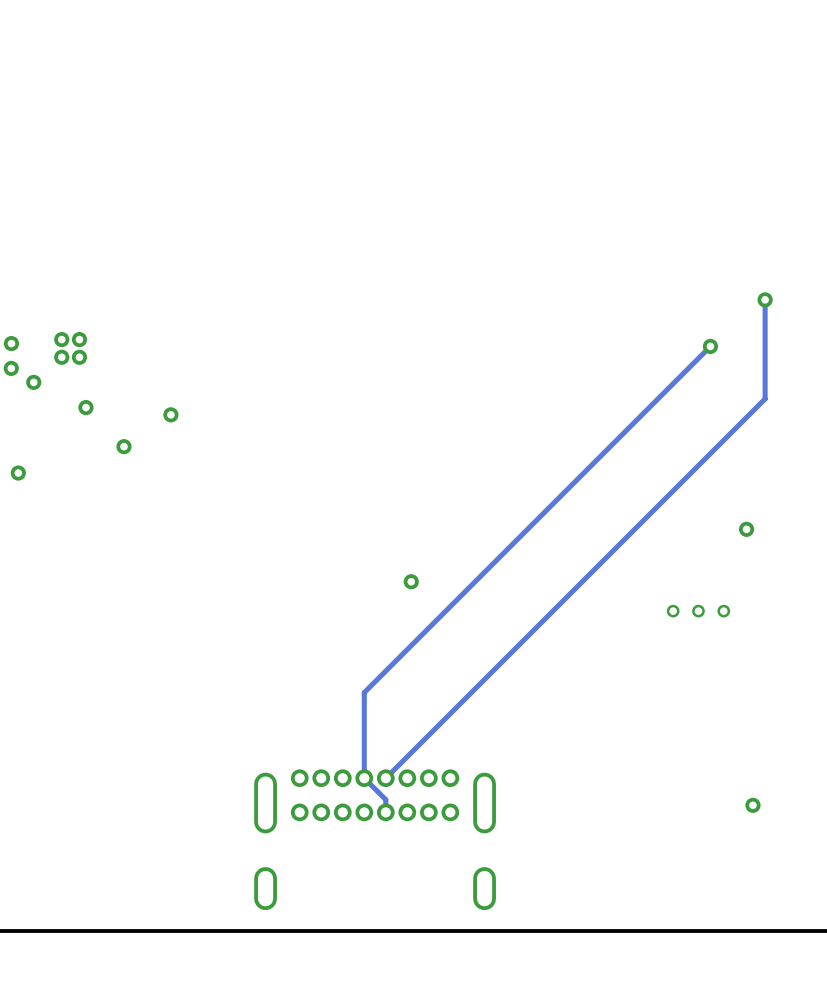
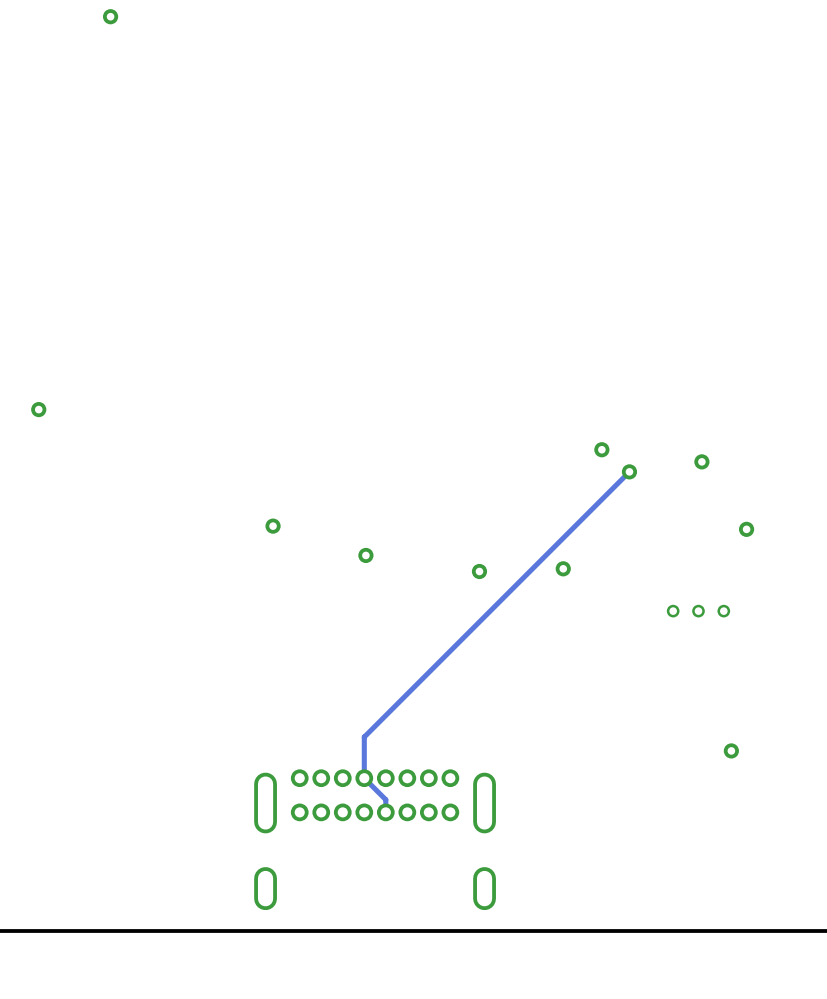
via: none -> (110, 16)
track: (765, 299) (765, 398) (385, 778) -> none
via: (765, 299) -> none
via: (61, 339) -> none
via: (79, 339) -> none
via: (11, 343) -> none
track: (710, 346) (364, 692) (364, 737) -> (629, 471) (364, 737)
via: (710, 346) -> none
via: (61, 357) -> none
via: (79, 357) -> none
via: (11, 368) -> none
via: (33, 382) -> none
via: (85, 407) -> none
via: none -> (38, 409)
via: (170, 414) -> none
via: (123, 446) -> none
via: none -> (601, 449)
via: none -> (701, 461)
via: none -> (629, 471)
via: (18, 473) -> none
via: none -> (273, 526)
via: none -> (365, 555)
via: none -> (563, 568)
via: none -> (479, 571)
via: (411, 581) -> none
via position: (752, 805) -> (731, 750)

